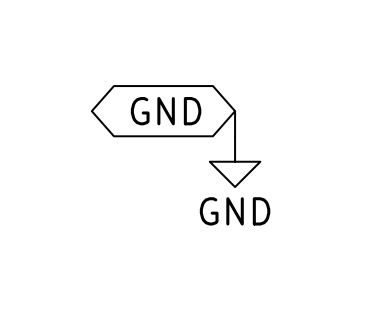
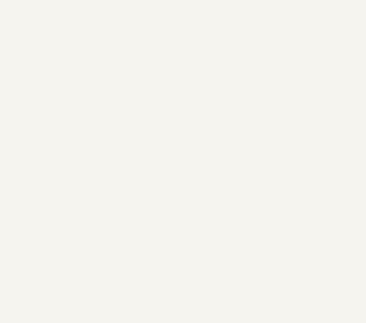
global label: GND (166, 111) -> none
wire: (235, 111) (235, 136) -> none
power symbol: GND (235, 161) -> none

